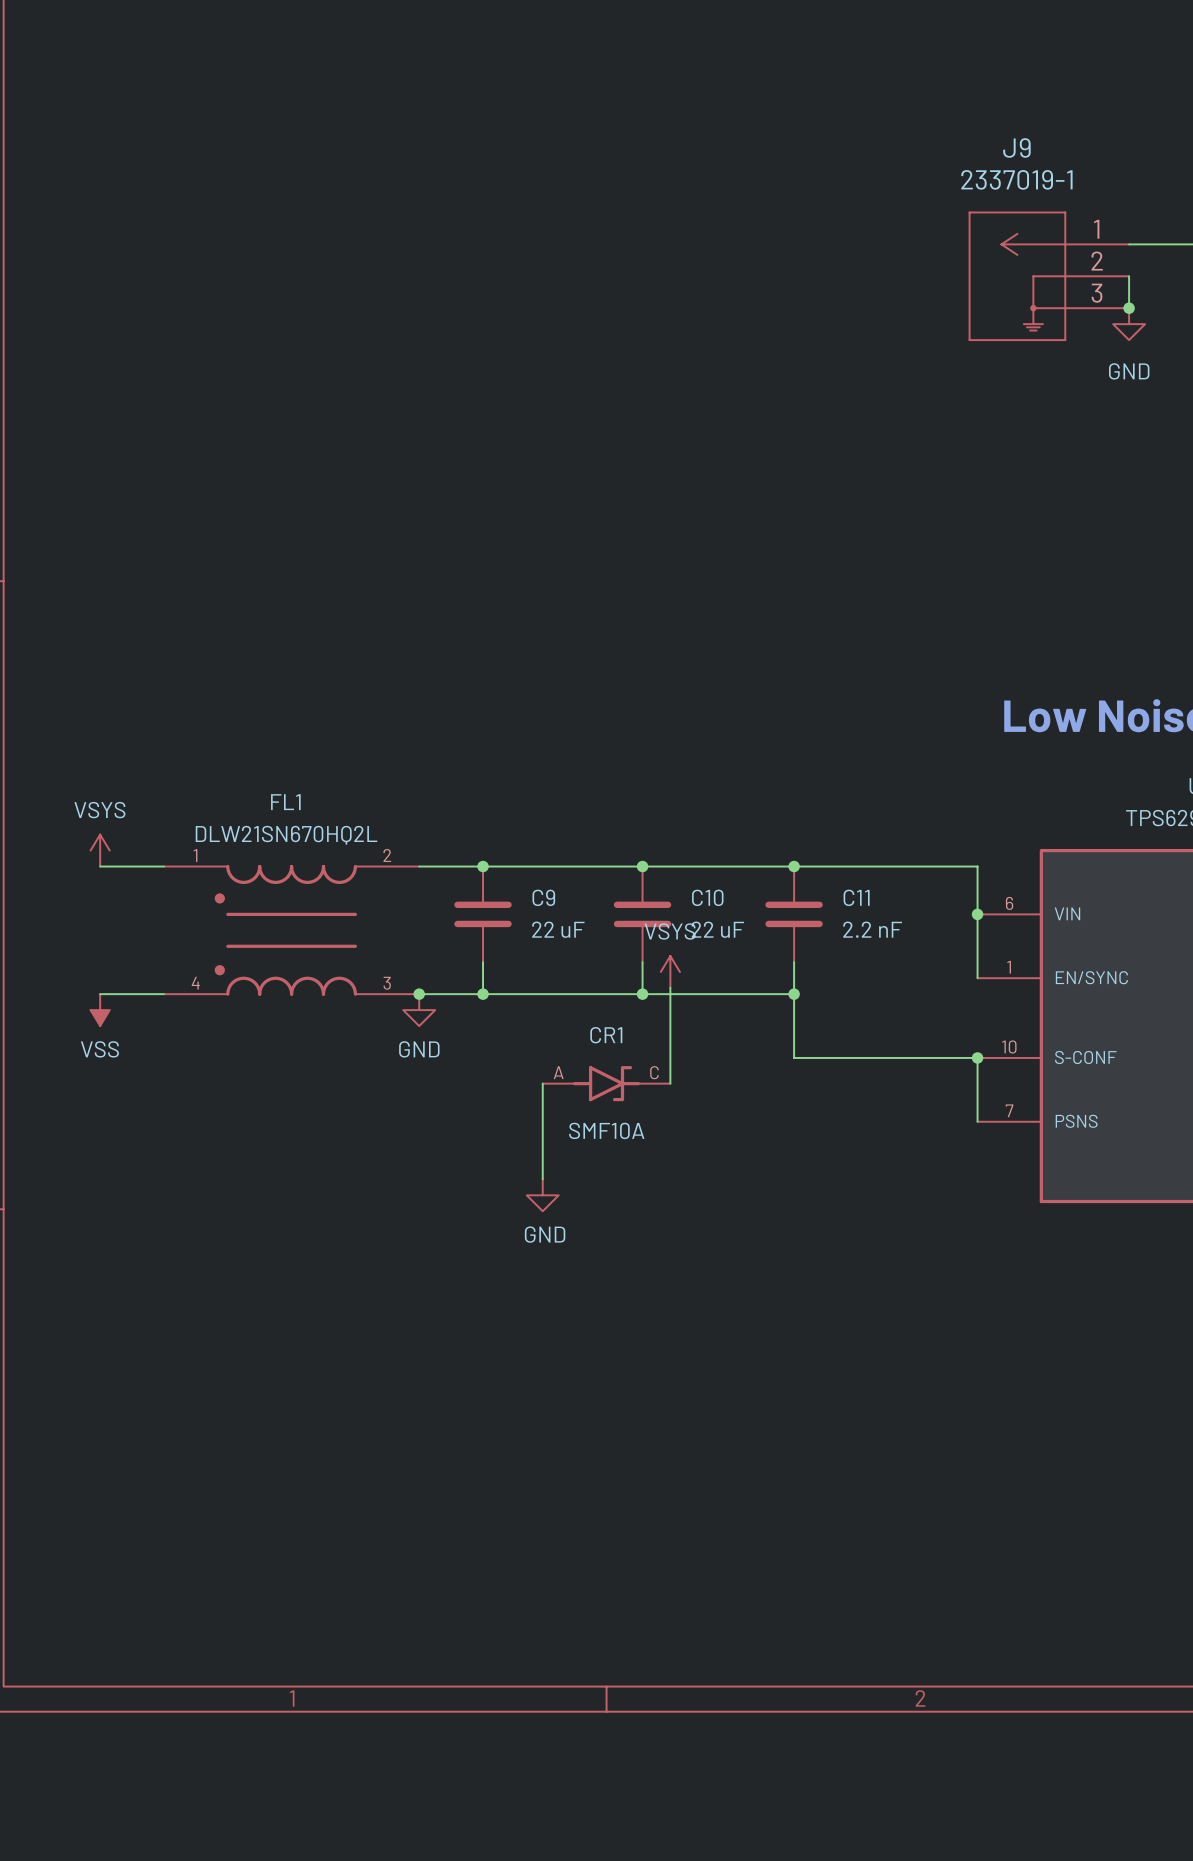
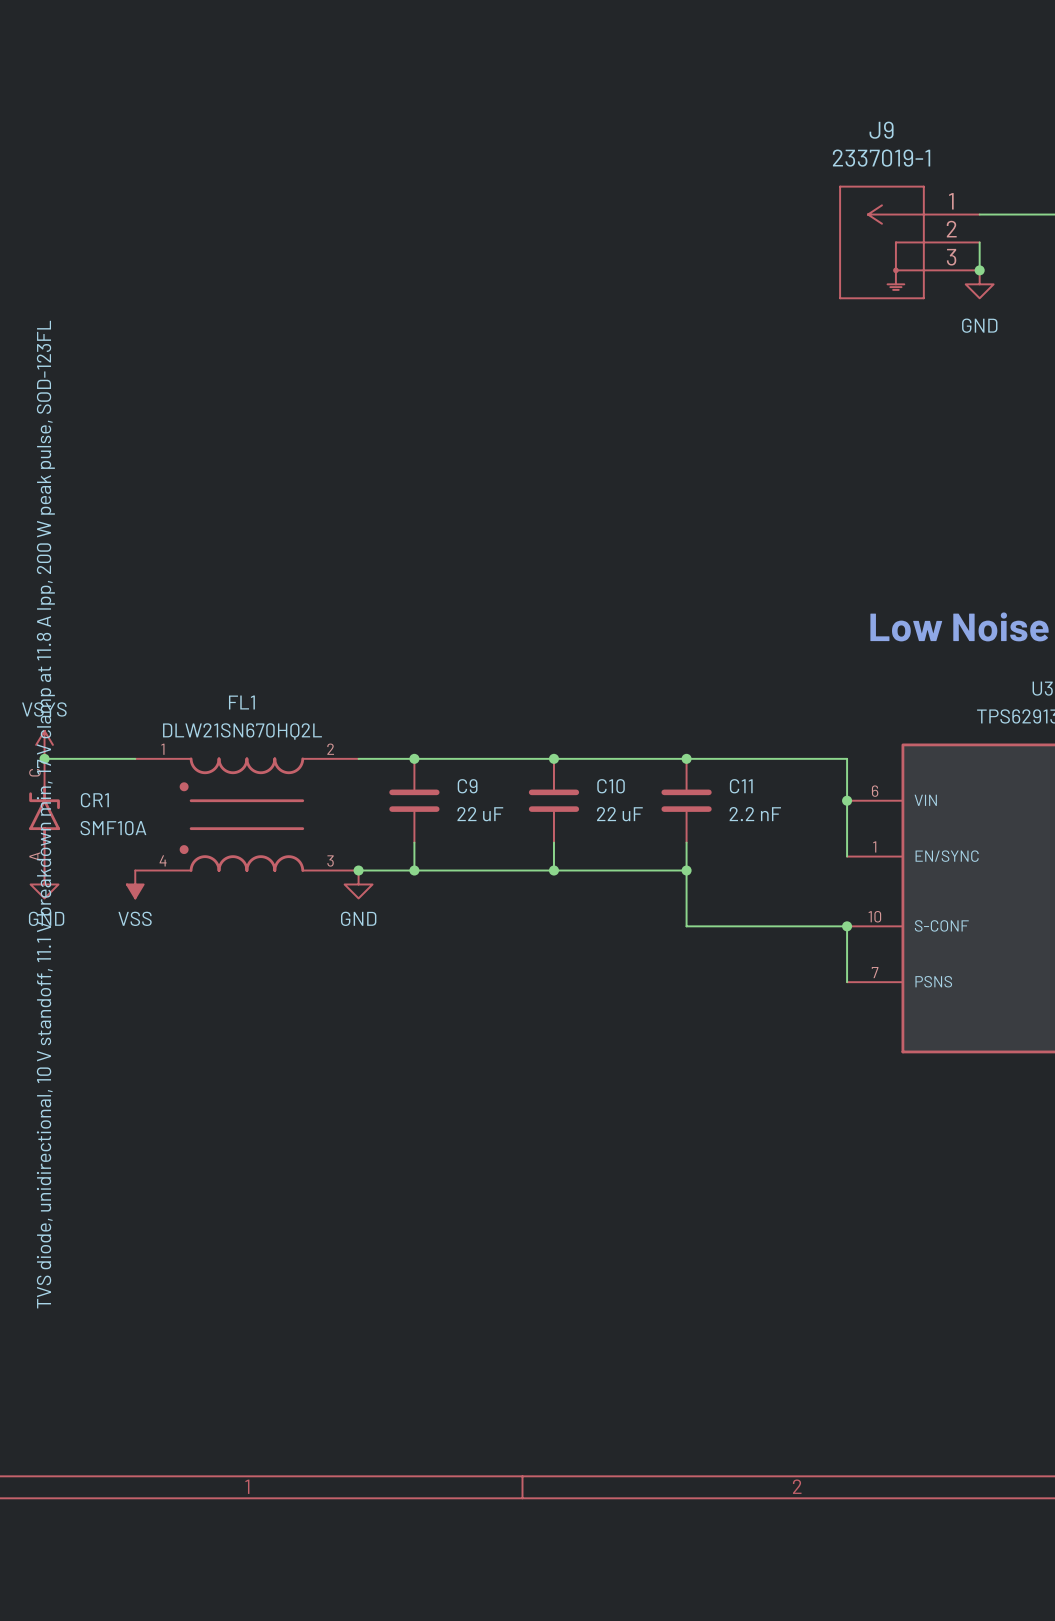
power symbol position: VSYS (100, 850) -> VSYS (44, 744)
wire: none -> (44, 758) (79, 758)
junction: none -> (44, 758)
CR1 text: none -> TVS diode, unidirectional, 10 V standoff, 11.1 V breakdown min, 17 V clamp at 11.8 A Ipp, 200 W peak pulse, SOD-123FL (45, 814)
power symbol: VSYS (670, 971) -> none
wire: (670, 987) (670, 1083) -> none
wire: (100, 994) (163, 994) -> none
power symbol: none -> GND (44, 884)
power symbol position: VSS (100, 1010) -> VSS (135, 884)
CR1 name position: CR1 (606, 1035) -> CR1 (94, 800)
wire: (542, 1083) (542, 1179) -> none
CR1 rotation: 0° (606, 1083) -> 90° counterclockwise (44, 814)
CR1 position: (606, 1083) -> (44, 814)
CR1 value position: SMF10A (606, 1130) -> SMF10A (113, 828)
power symbol: GND (542, 1195) -> none

